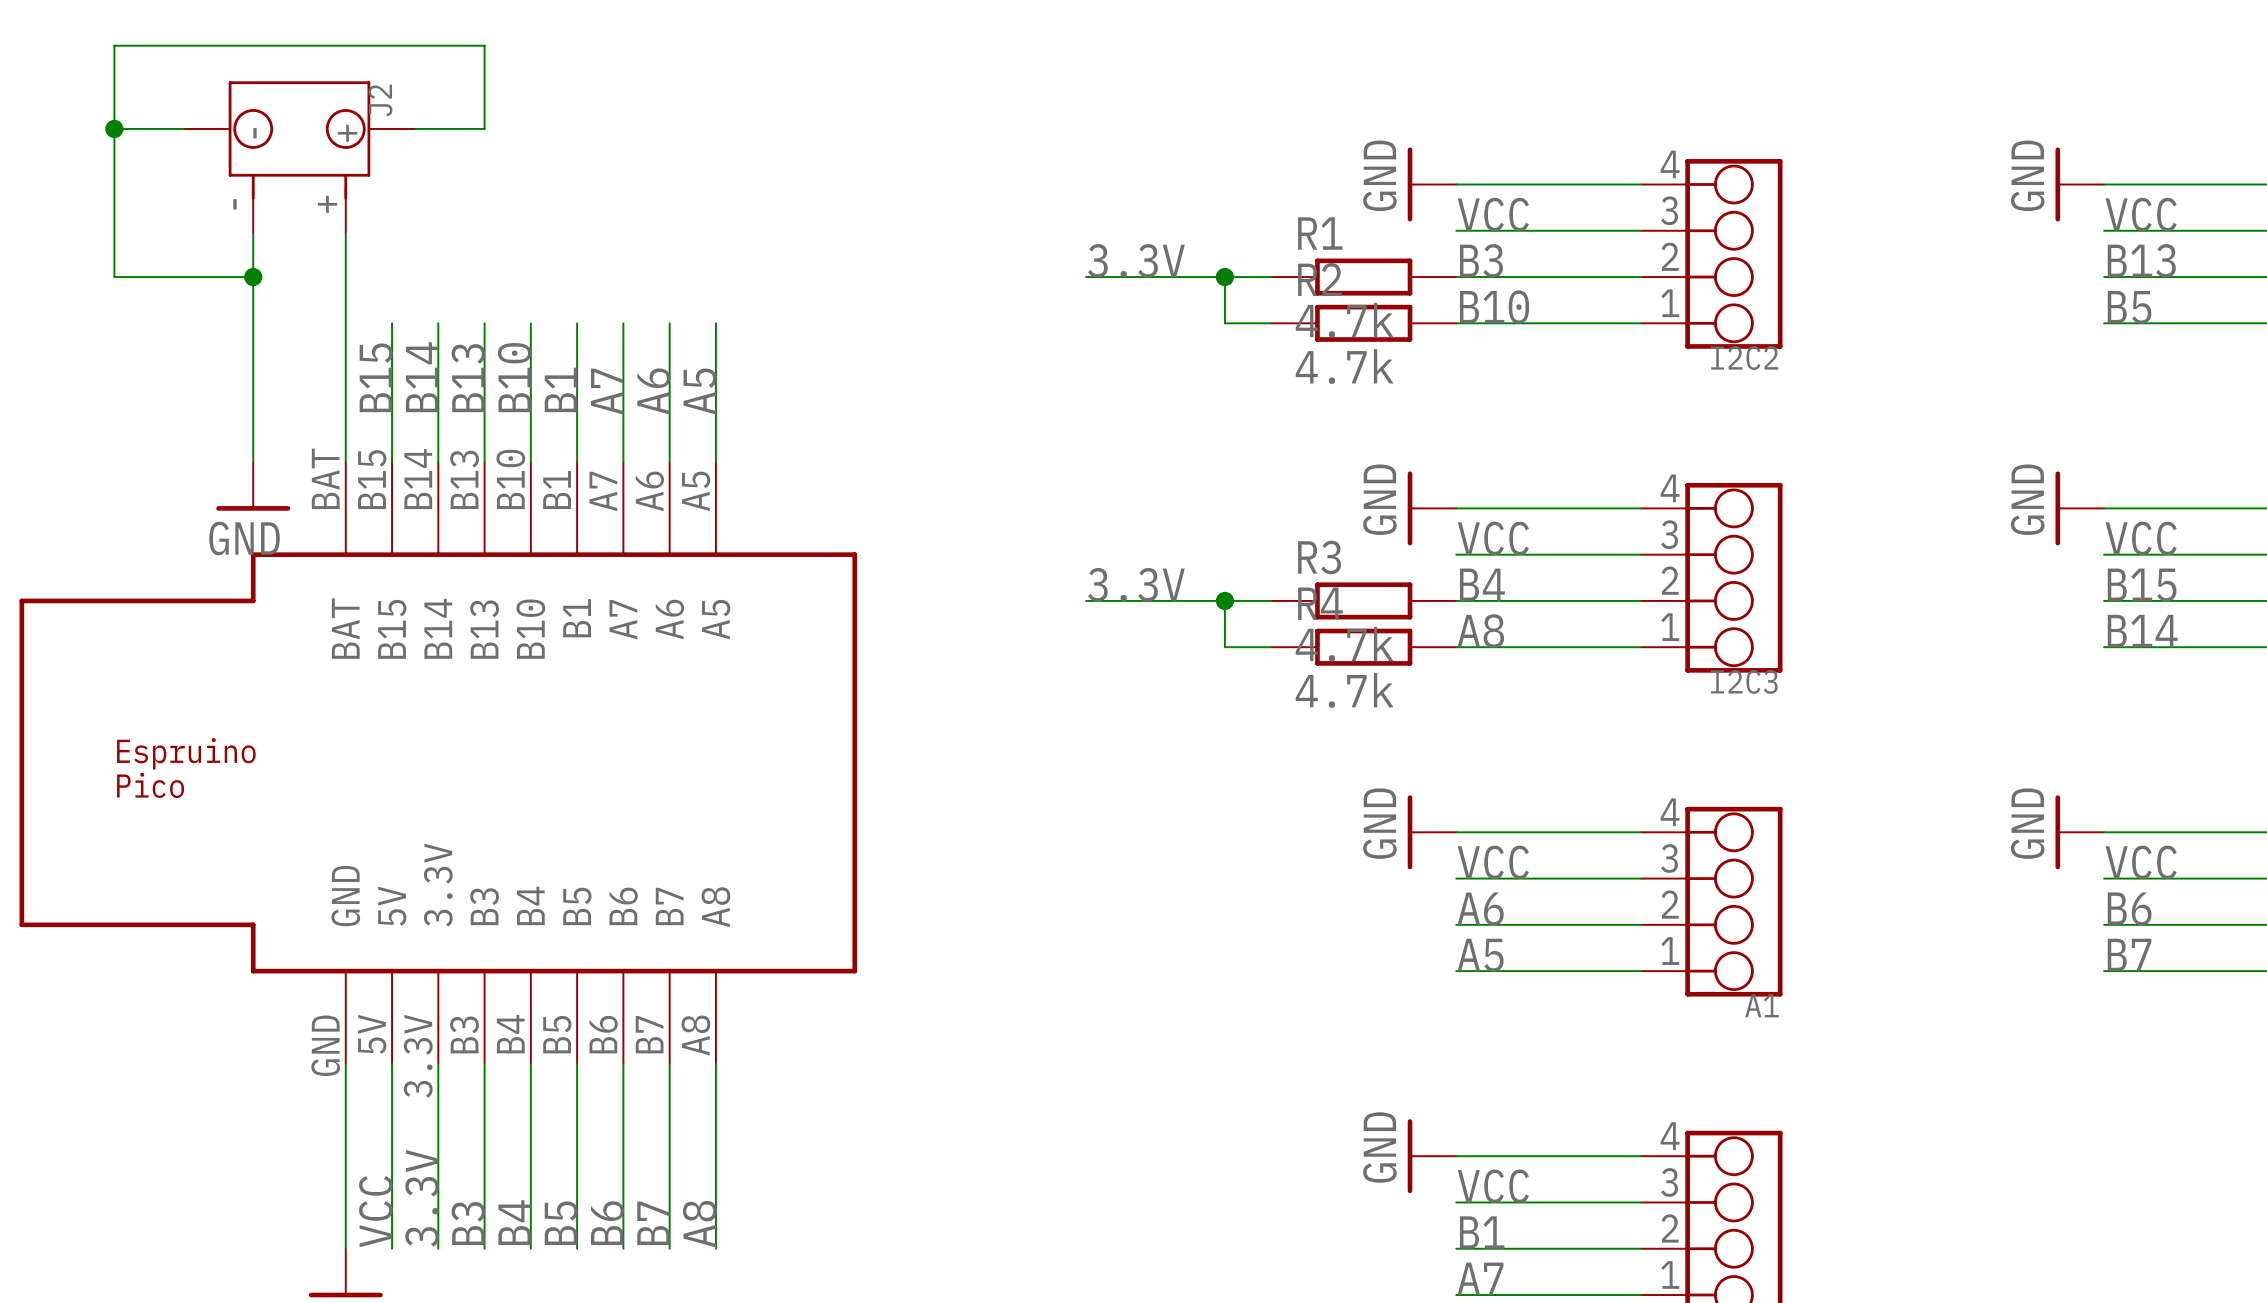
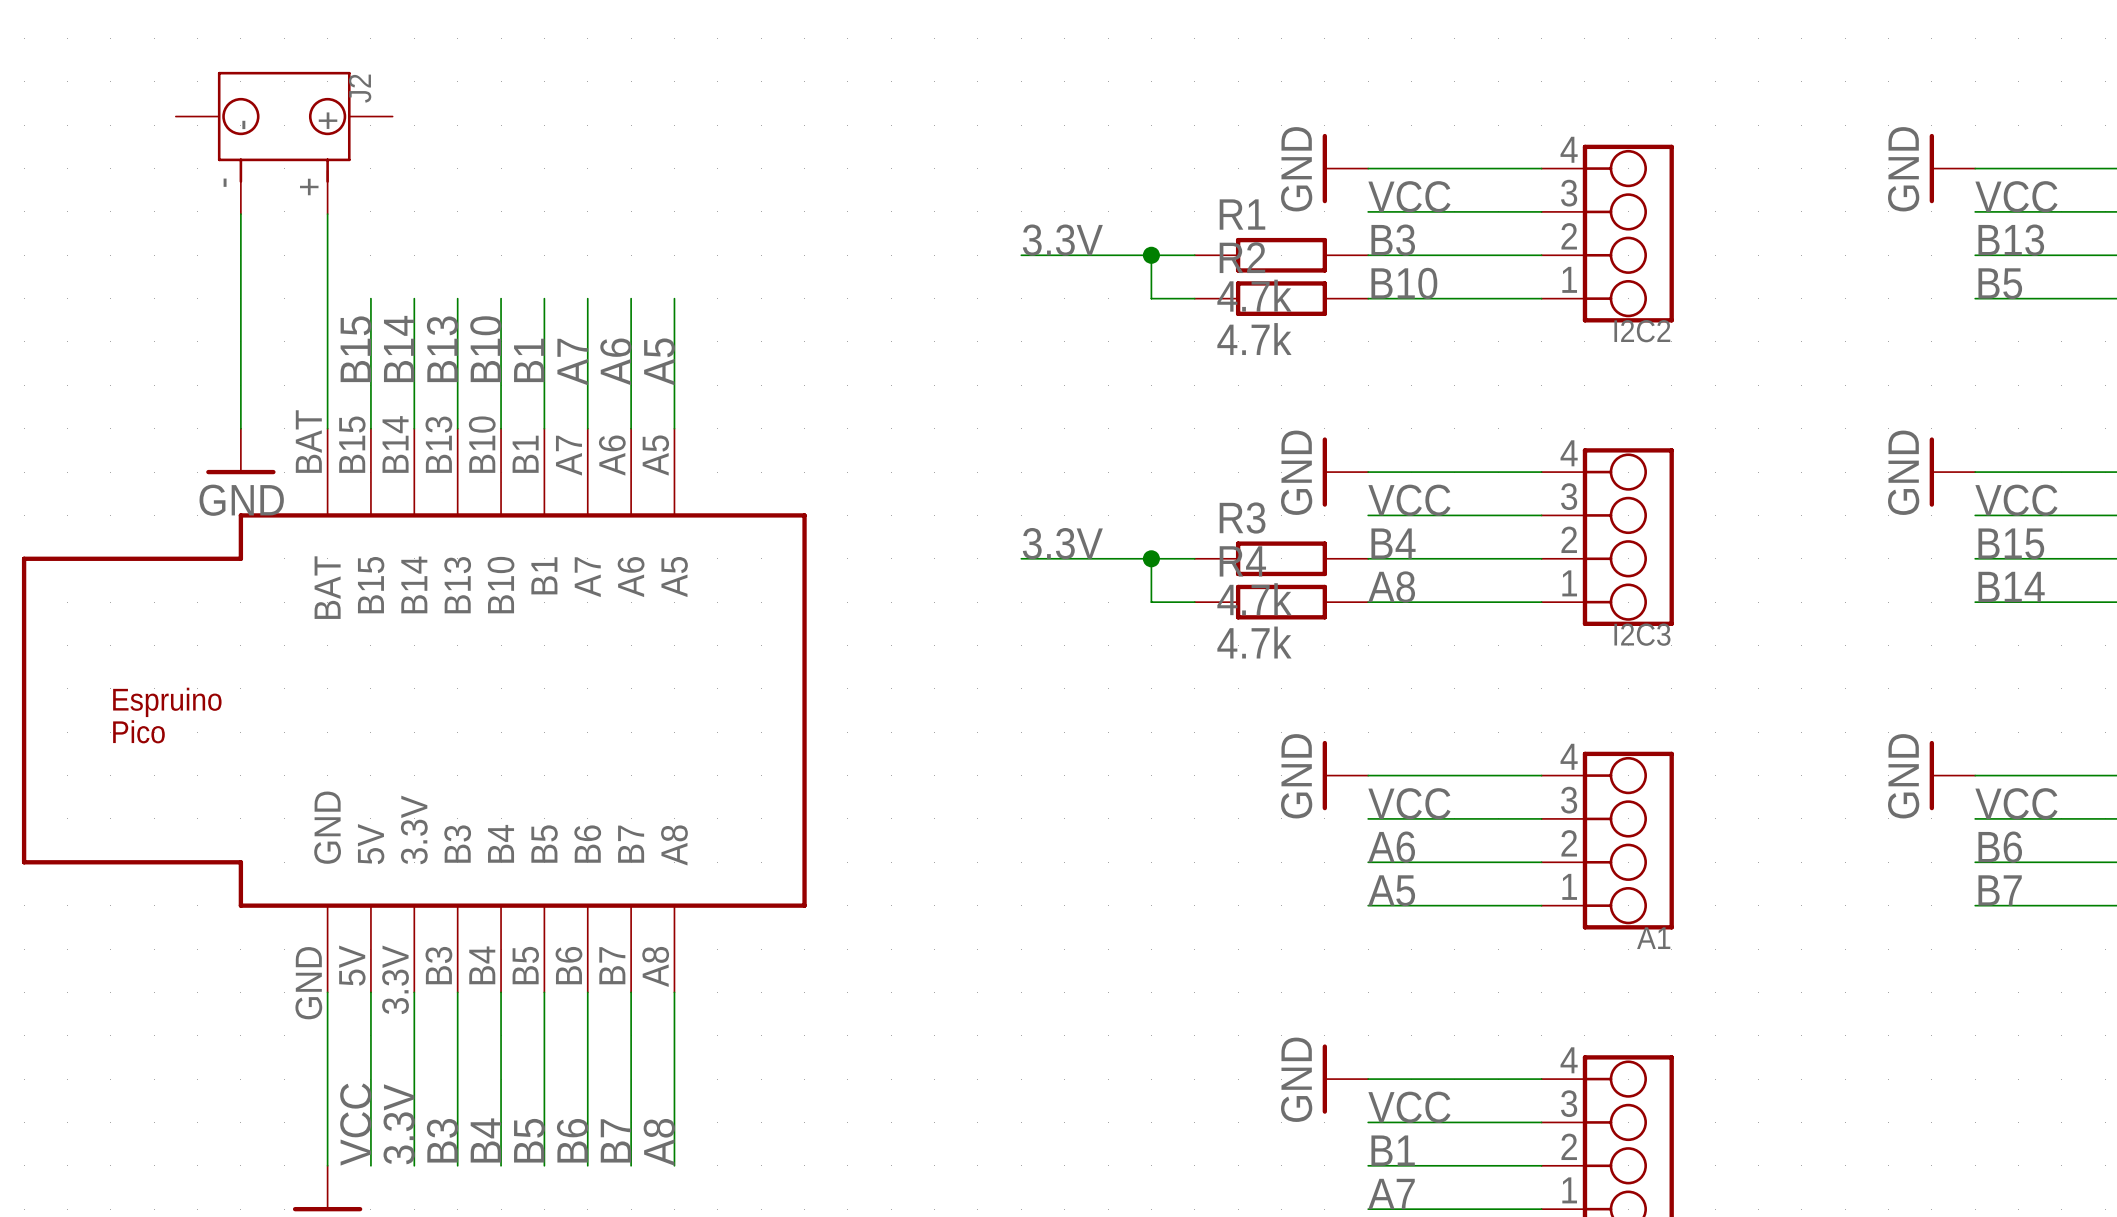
wire: (114, 128) (183, 128) -> none
junction: (114, 128) -> none
wire: (415, 128) (484, 128) (484, 45) (114, 45) (114, 277) (253, 277) -> none
junction: (253, 277) -> none

